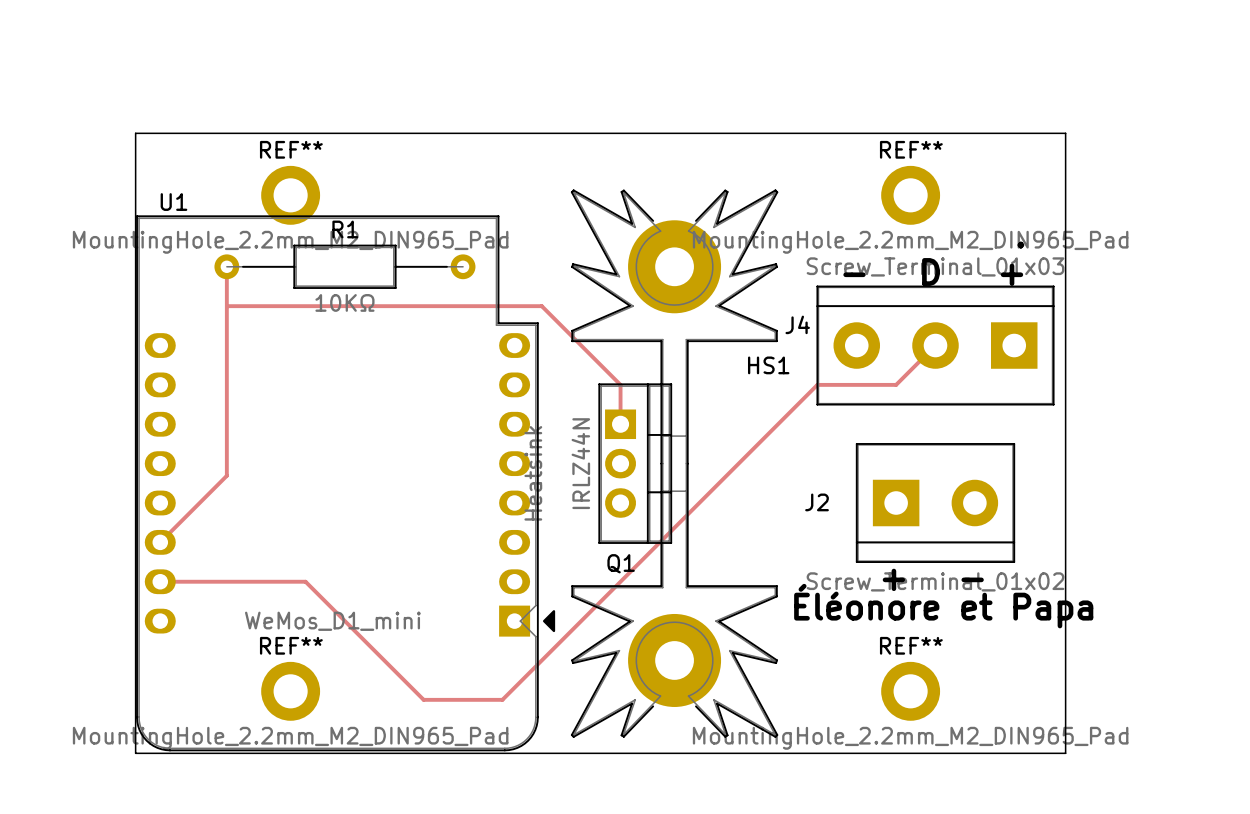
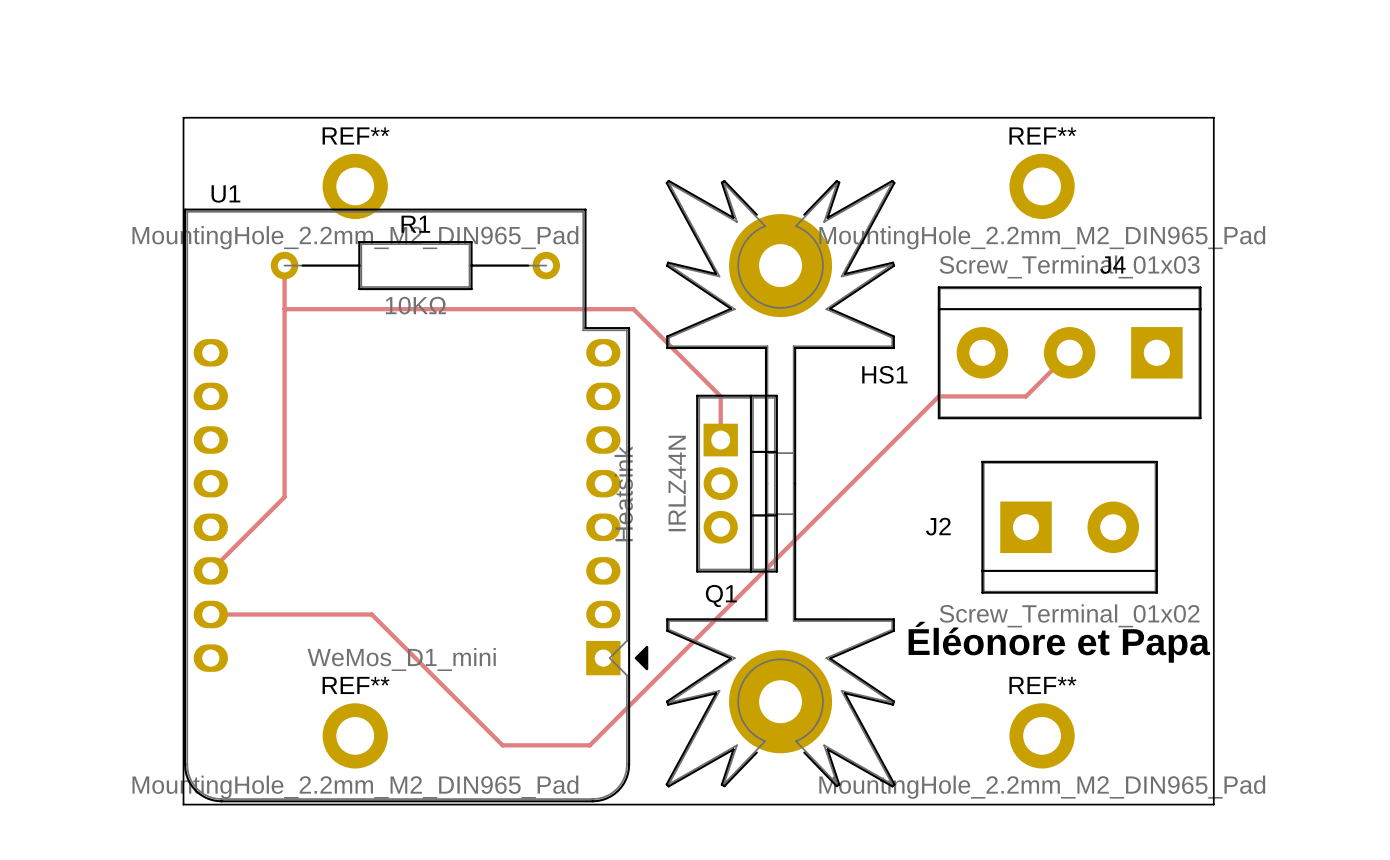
text: . (1020, 245) -> none
text: D (931, 272) -> none
text: - (854, 274) -> none
text: + (1012, 274) -> none
J4 name position: J4 (797, 324) -> J4 (1113, 265)
text: + (893, 579) -> none
text: - (972, 579) -> none

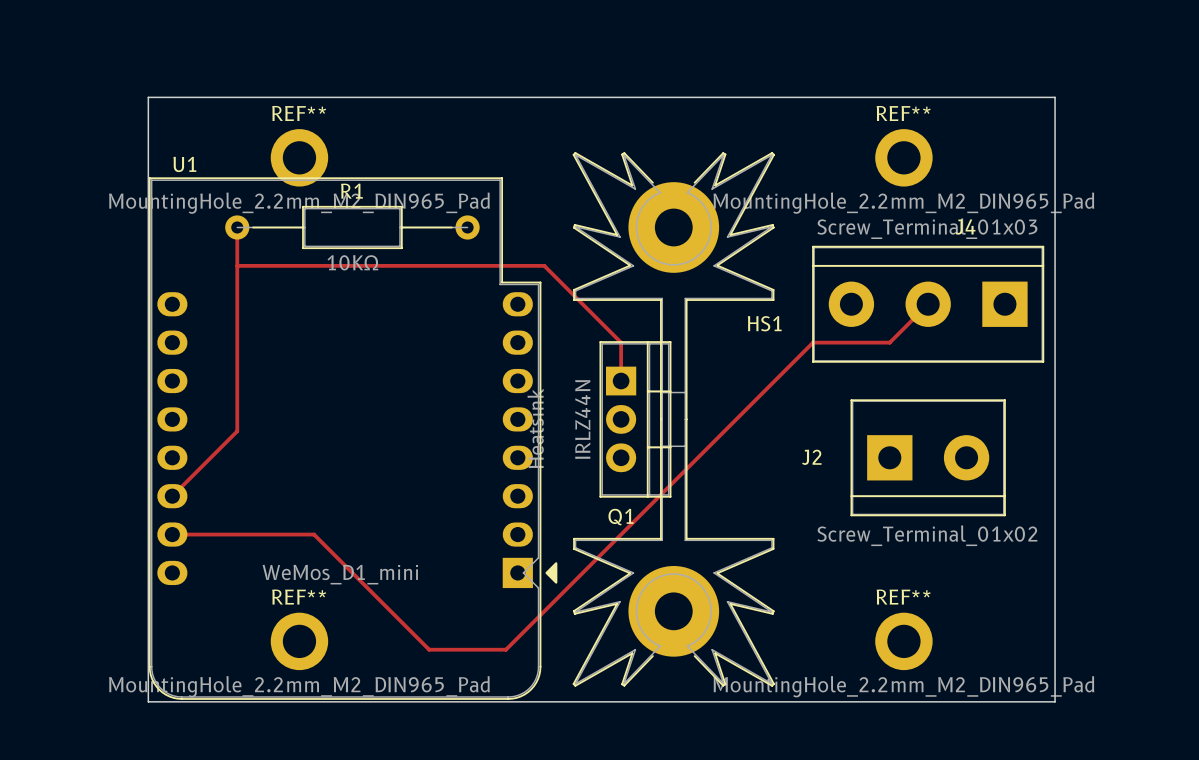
text: Éléonore et Papa (1059, 642) -> none

